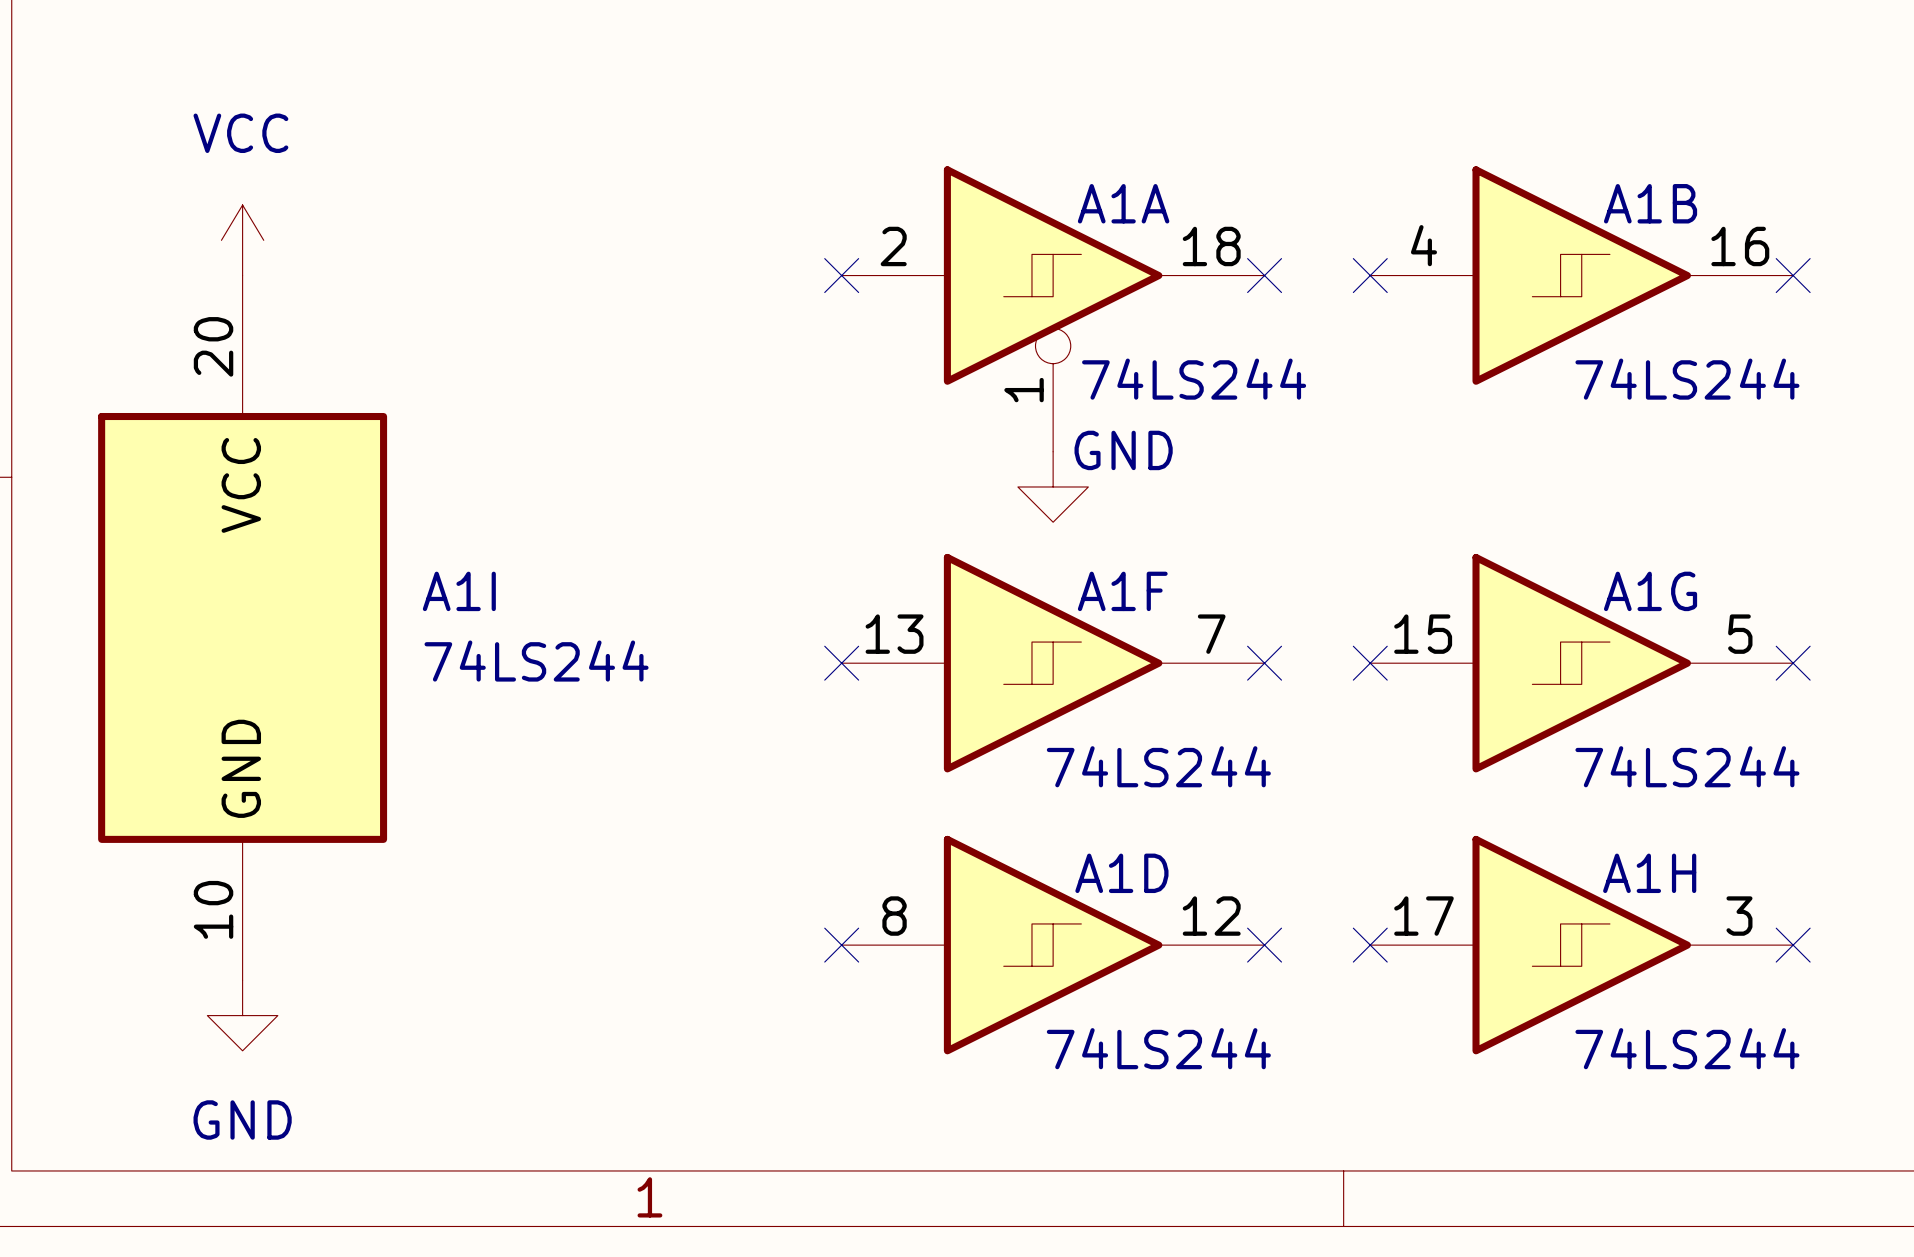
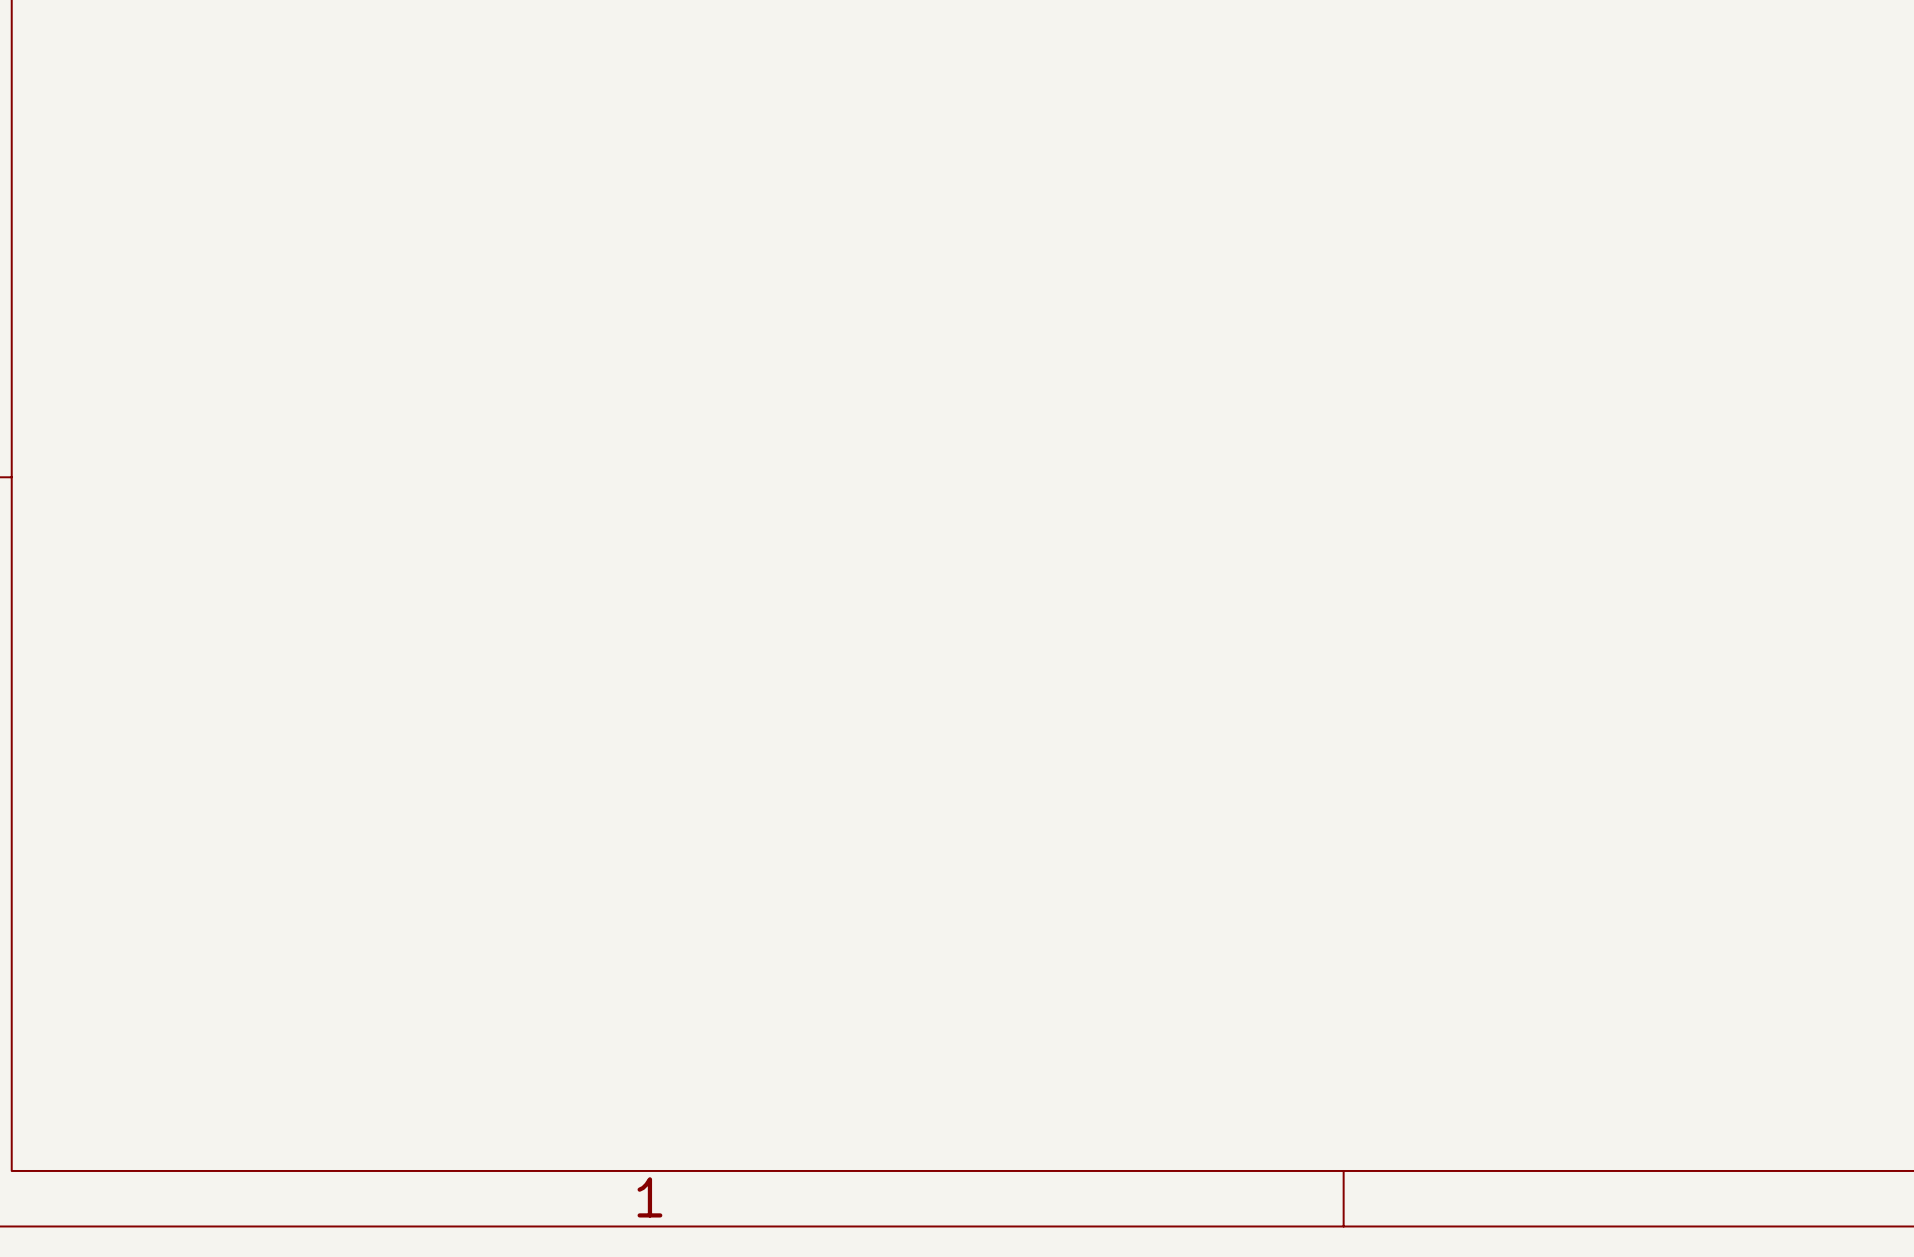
power symbol: VCC (242, 240) -> none
no-connect mark: (841, 275) -> none
no-connect mark: (1264, 275) -> none
no-connect mark: (1370, 275) -> none
A1B: 74LS244 (1581, 275) -> none
no-connect mark: (1793, 275) -> none
A1A: 74LS244 (1053, 309) -> none
power symbol: GND (1053, 486) -> none
A1I: 74LS244 (242, 627) -> none
no-connect mark: (841, 663) -> none
A1F: 74LS244 (1053, 663) -> none
no-connect mark: (1264, 663) -> none
no-connect mark: (1370, 663) -> none
A1G: 74LS244 (1581, 663) -> none
no-connect mark: (1793, 663) -> none
no-connect mark: (841, 945) -> none
A1D: 74LS244 (1053, 945) -> none
no-connect mark: (1264, 945) -> none
no-connect mark: (1370, 945) -> none
A1H: 74LS244 (1581, 945) -> none
no-connect mark: (1793, 945) -> none
power symbol: GND (242, 1015) -> none

